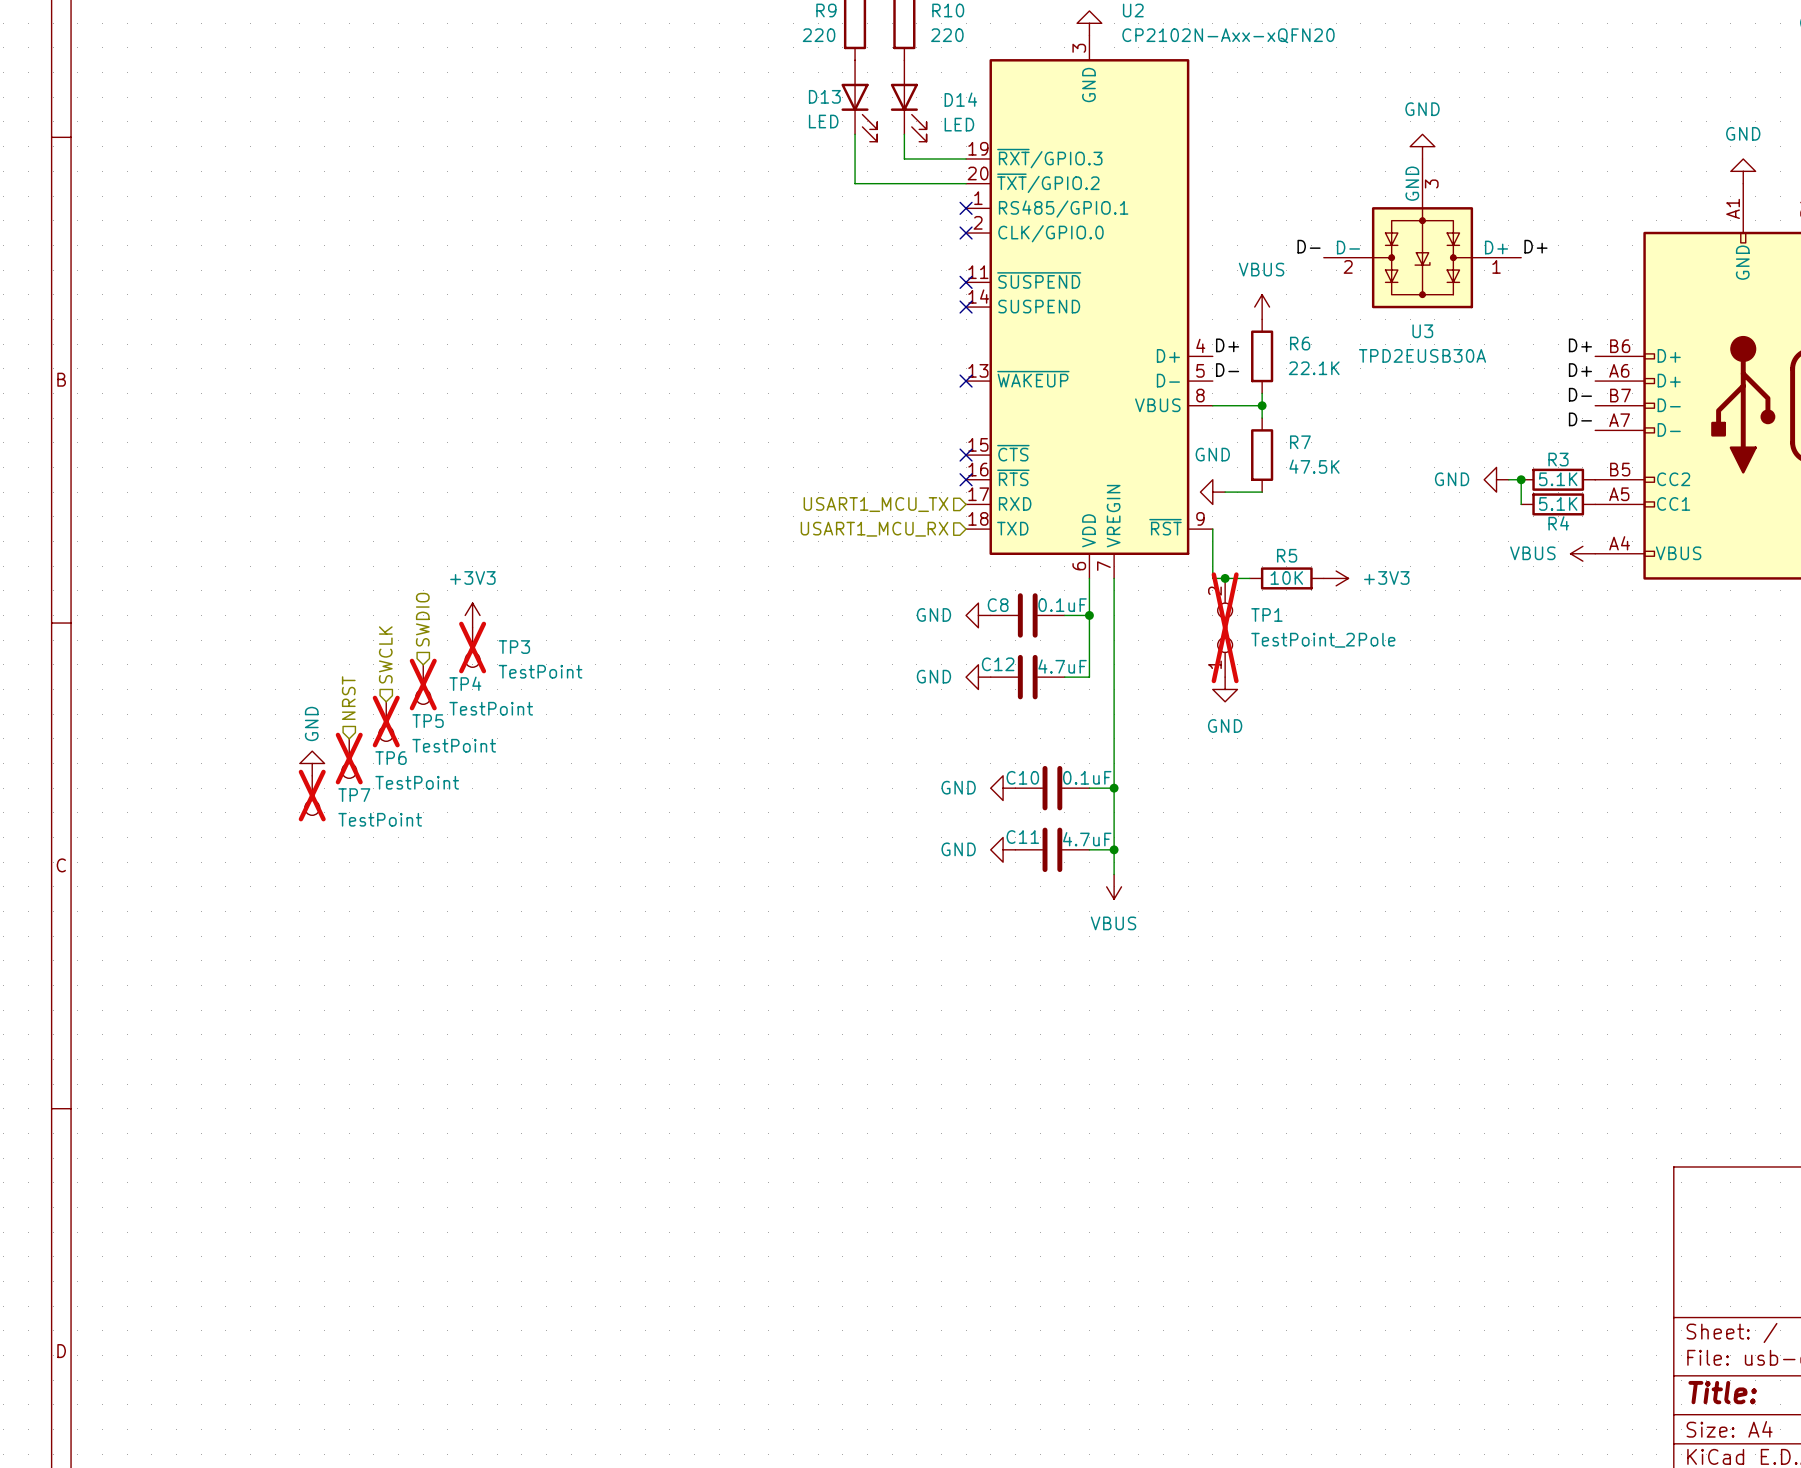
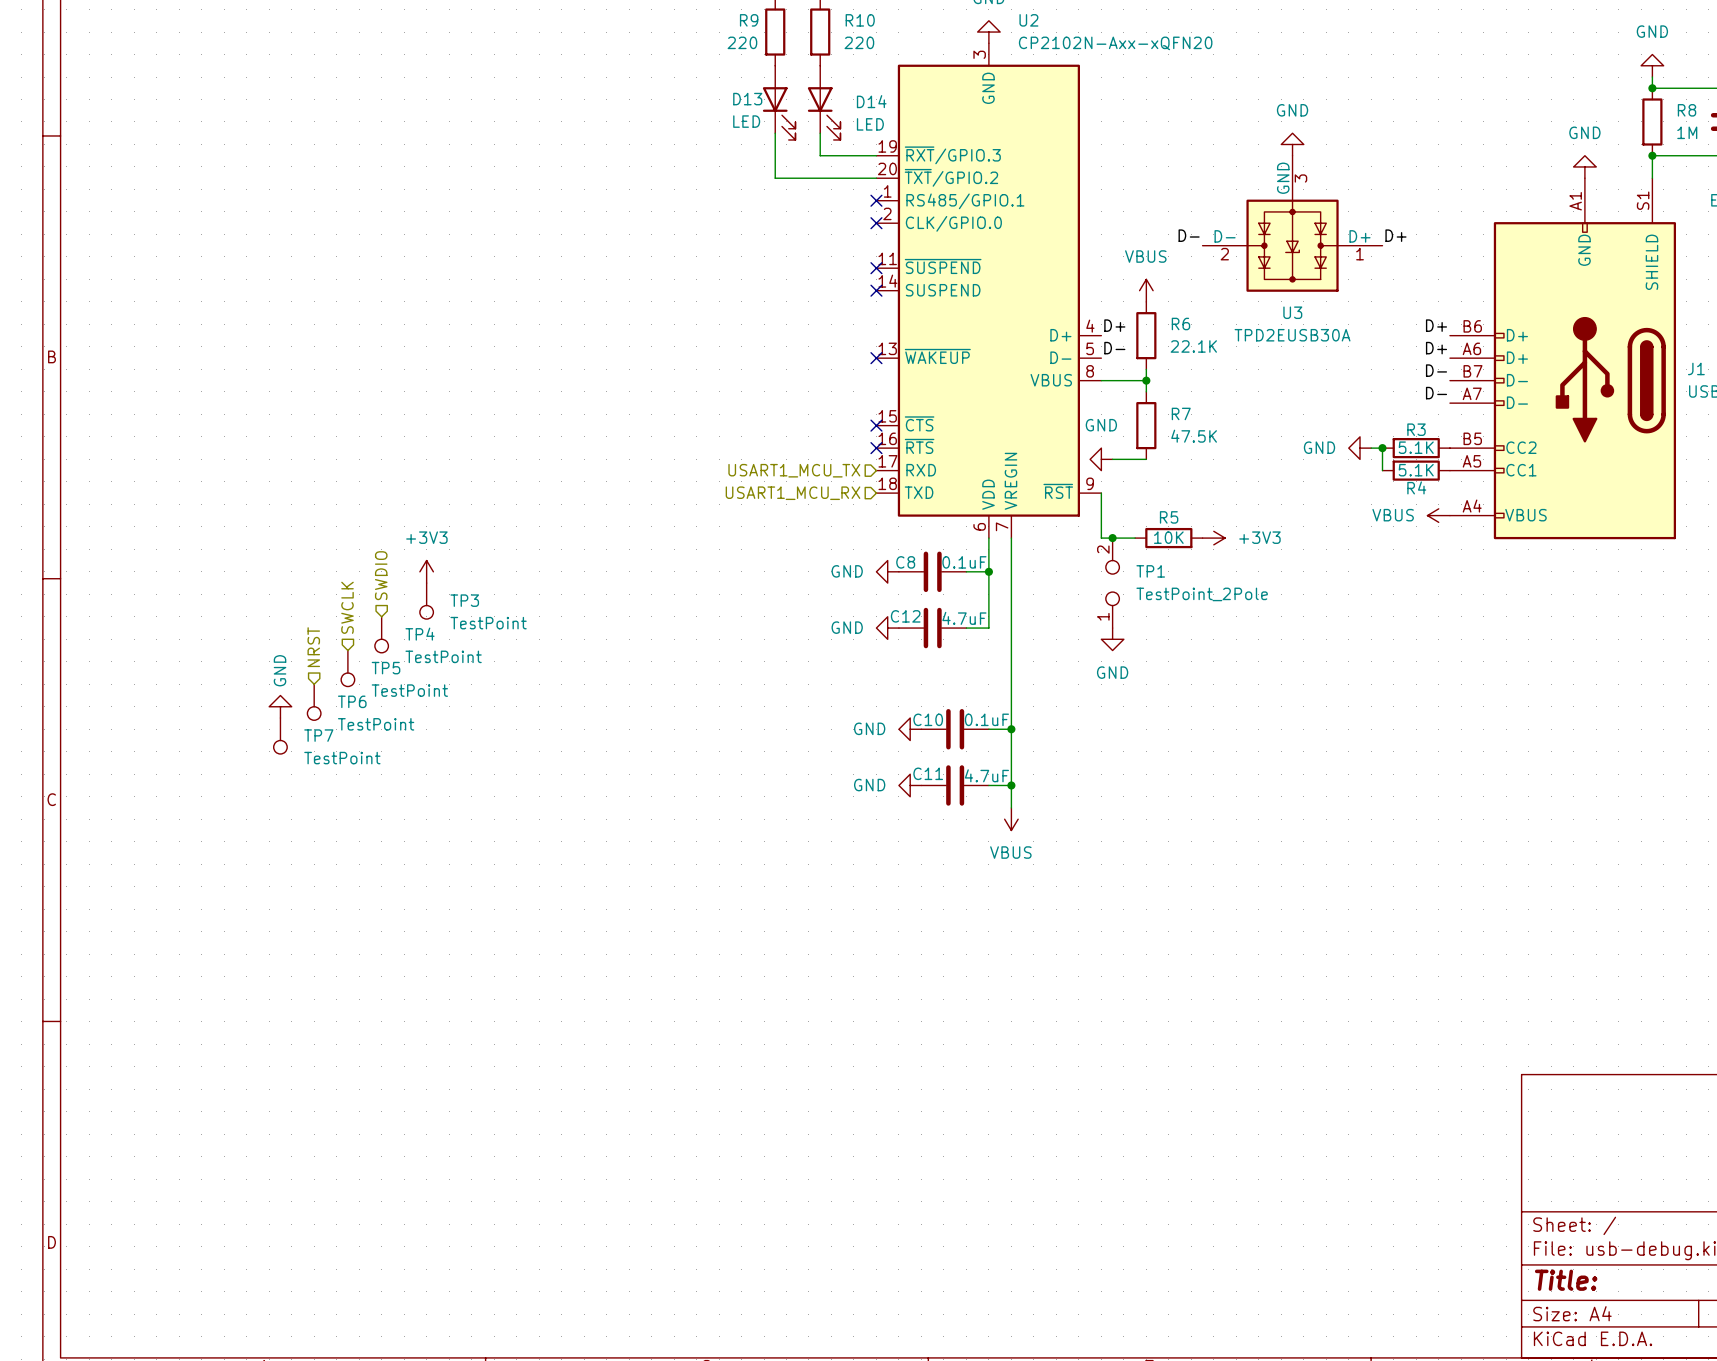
TP1 do-not-place cross: (1225, 627) -> none
TP3 do-not-place cross: (472, 647) -> none
TP4 do-not-place cross: (423, 684) -> none
TP5 do-not-place cross: (386, 721) -> none
TP6 do-not-place cross: (349, 758) -> none
TP7 do-not-place cross: (312, 795) -> none

